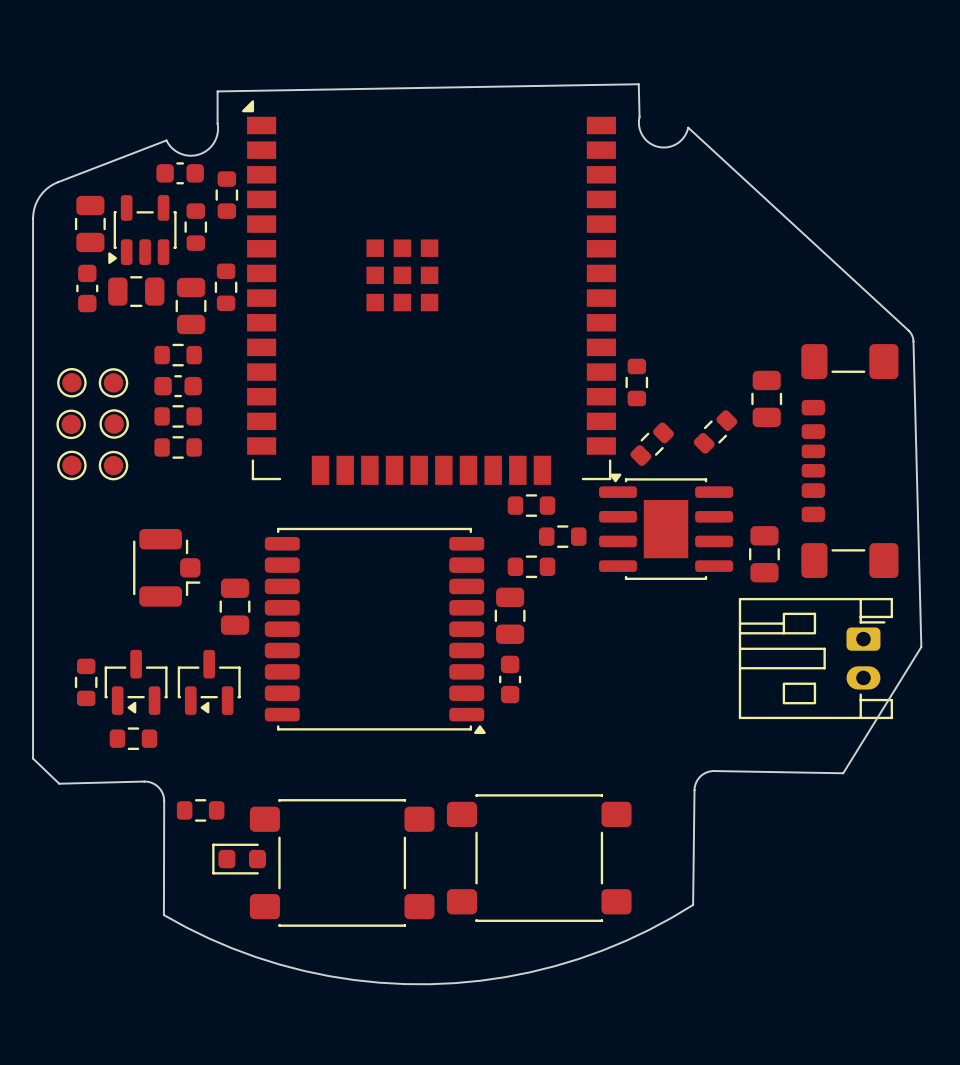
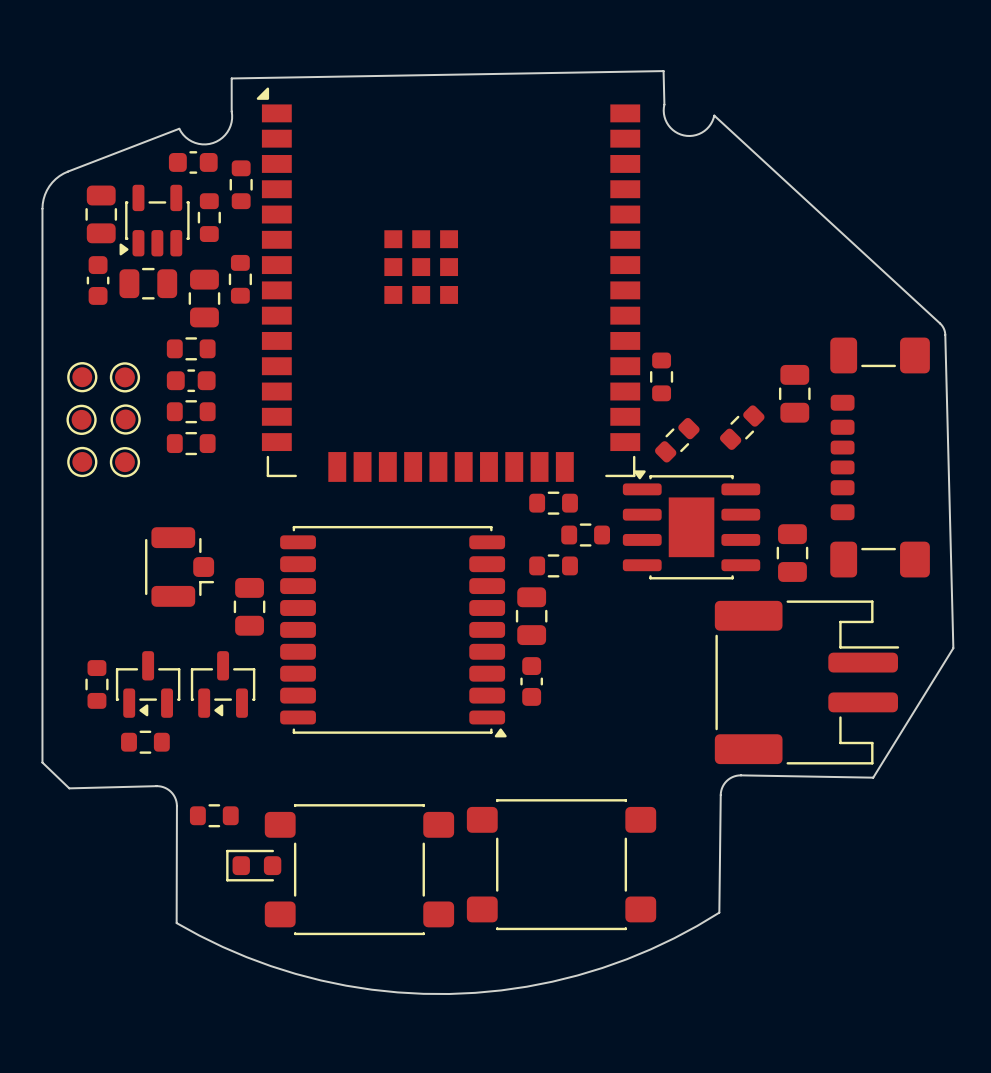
part: (815, 658) -> none
part: none -> (807, 682)

